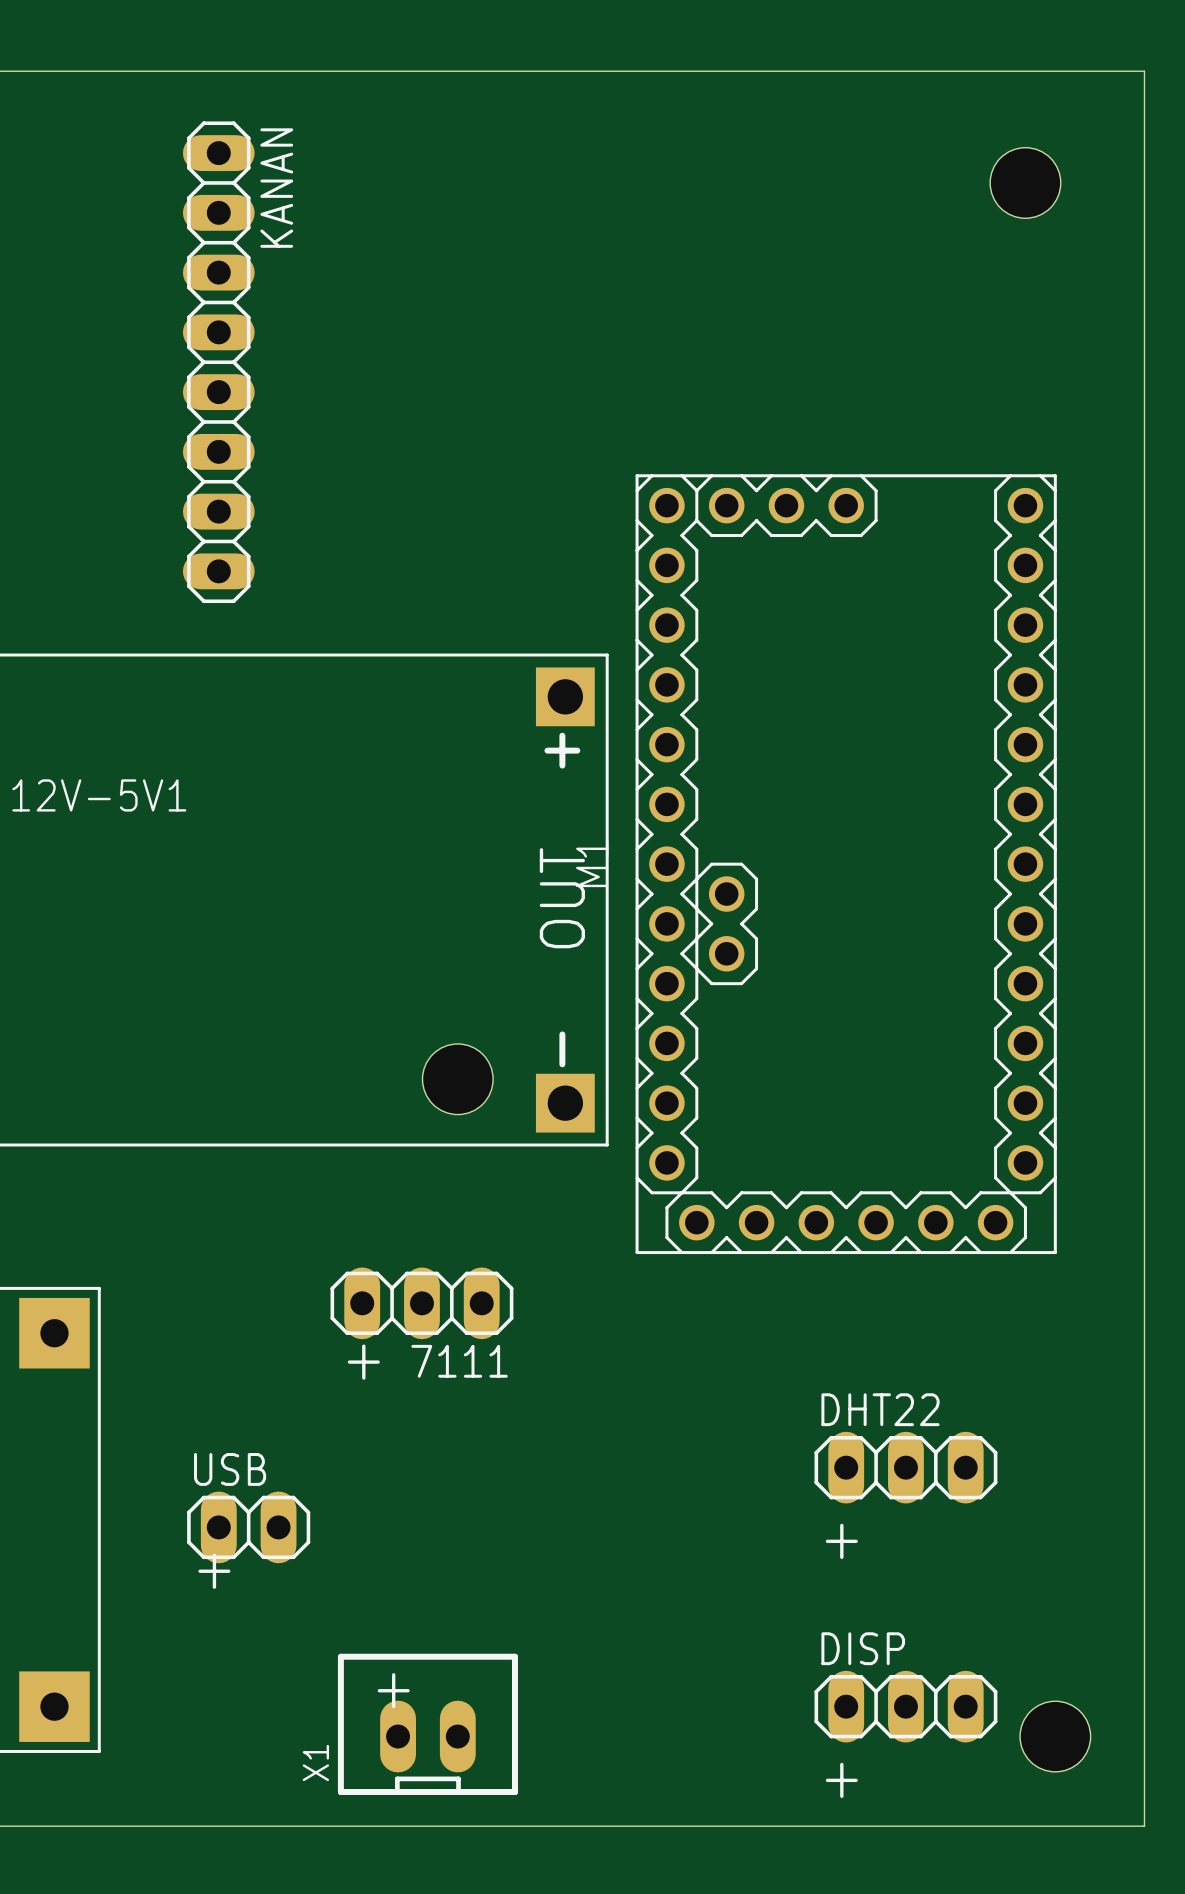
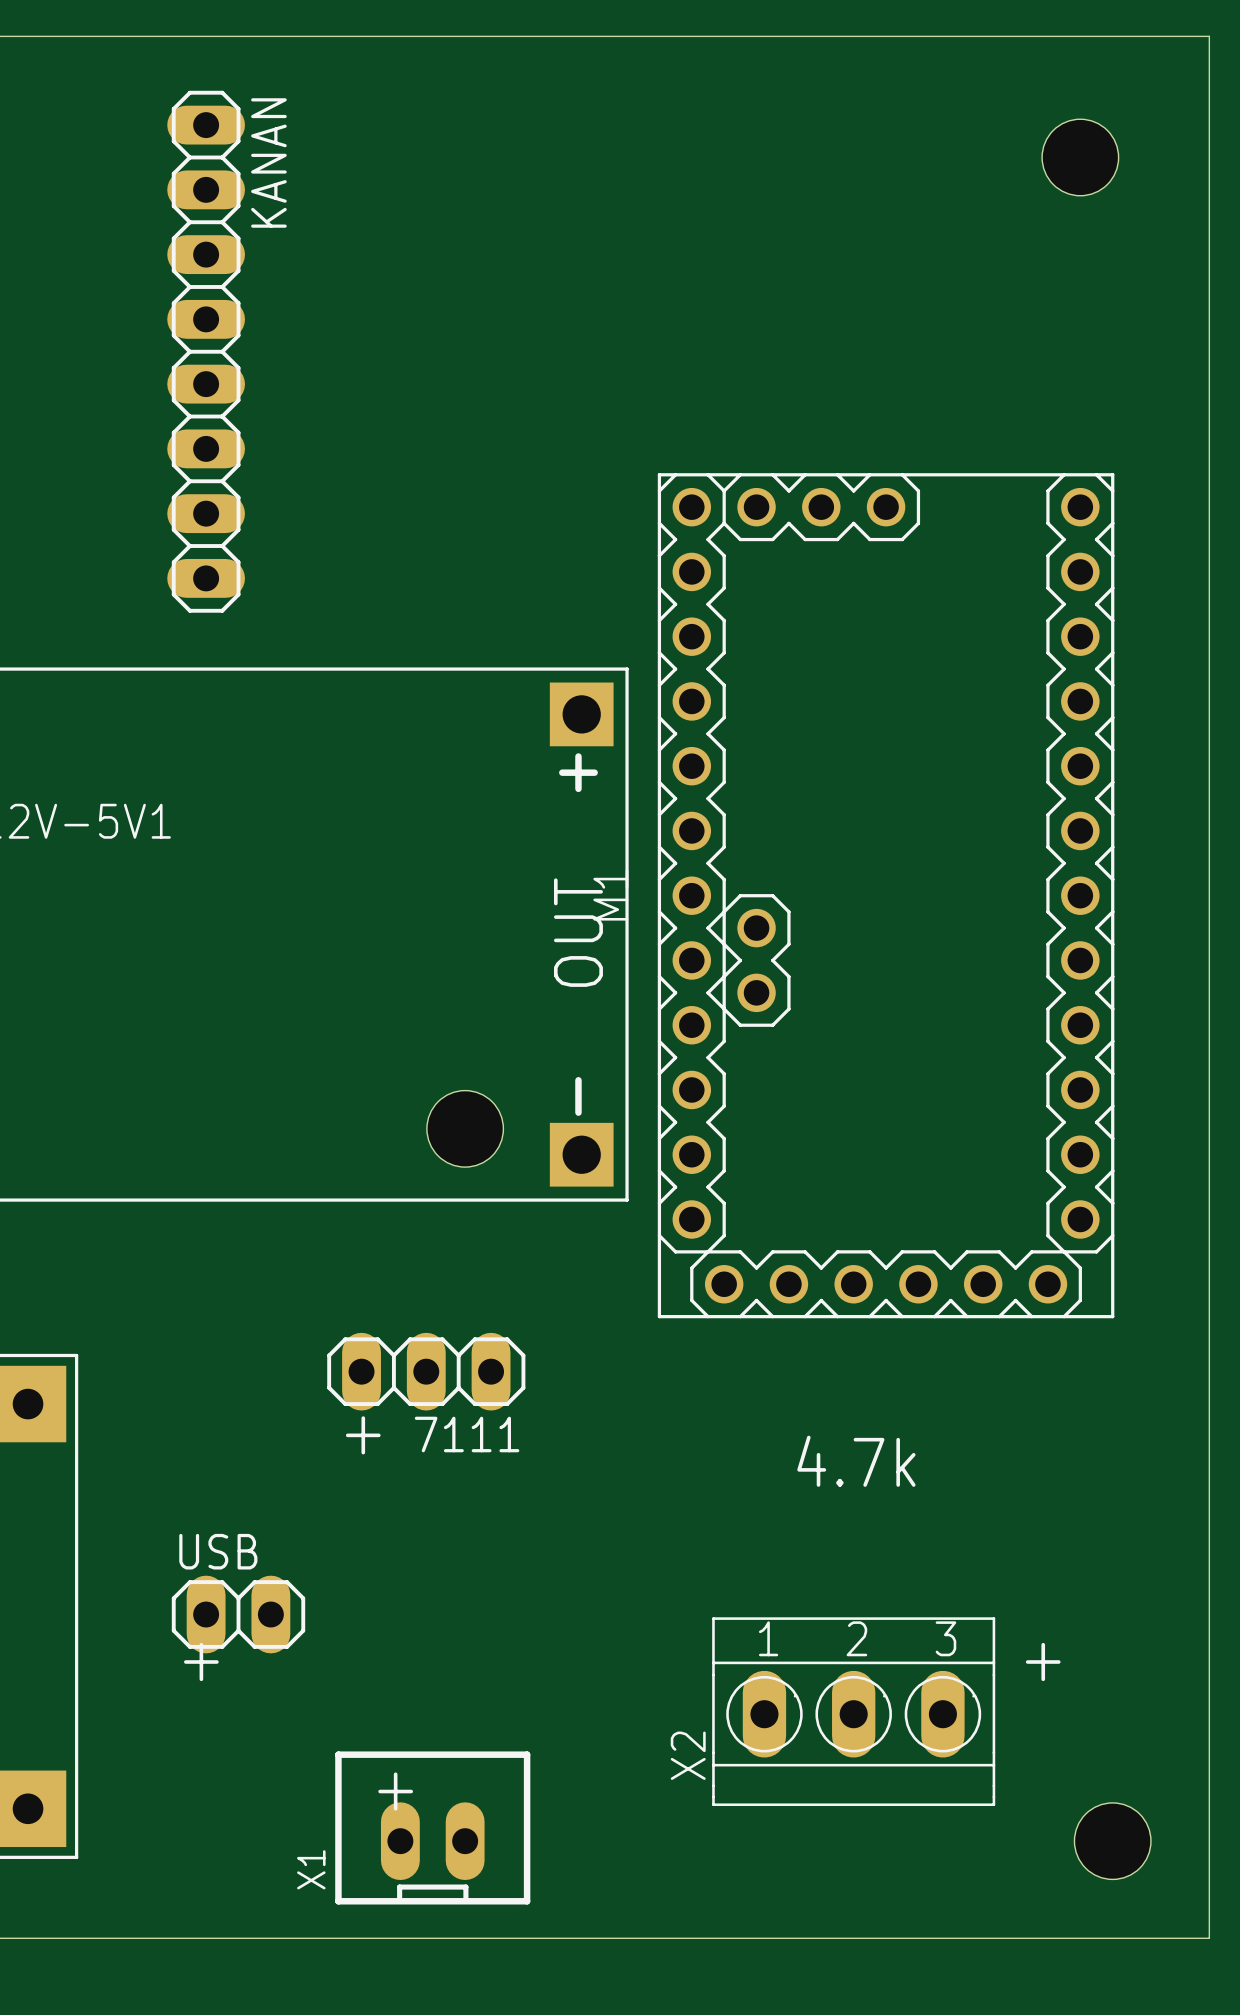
text: none -> 4.7k (856, 1461)
DHT22: (905, 1467) -> none
text: + (841, 1541) -> none
text: none -> + (1043, 1662)
X2: none -> (853, 1711)
DISP: (905, 1706) -> none
text: + (841, 1780) -> none

